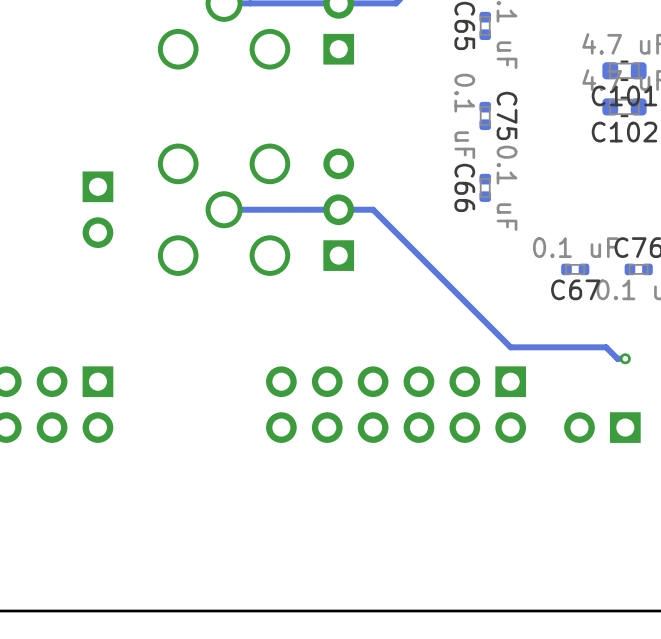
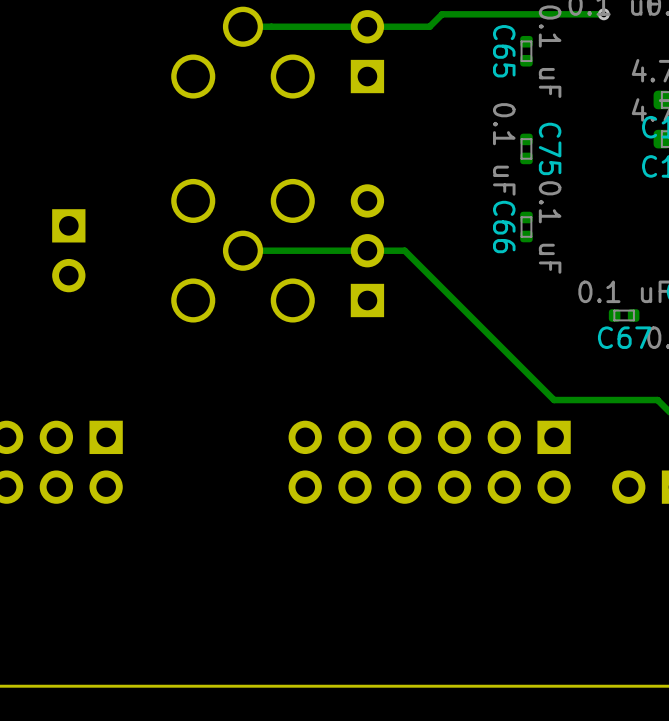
part position: (97, 209) -> (68, 250)

